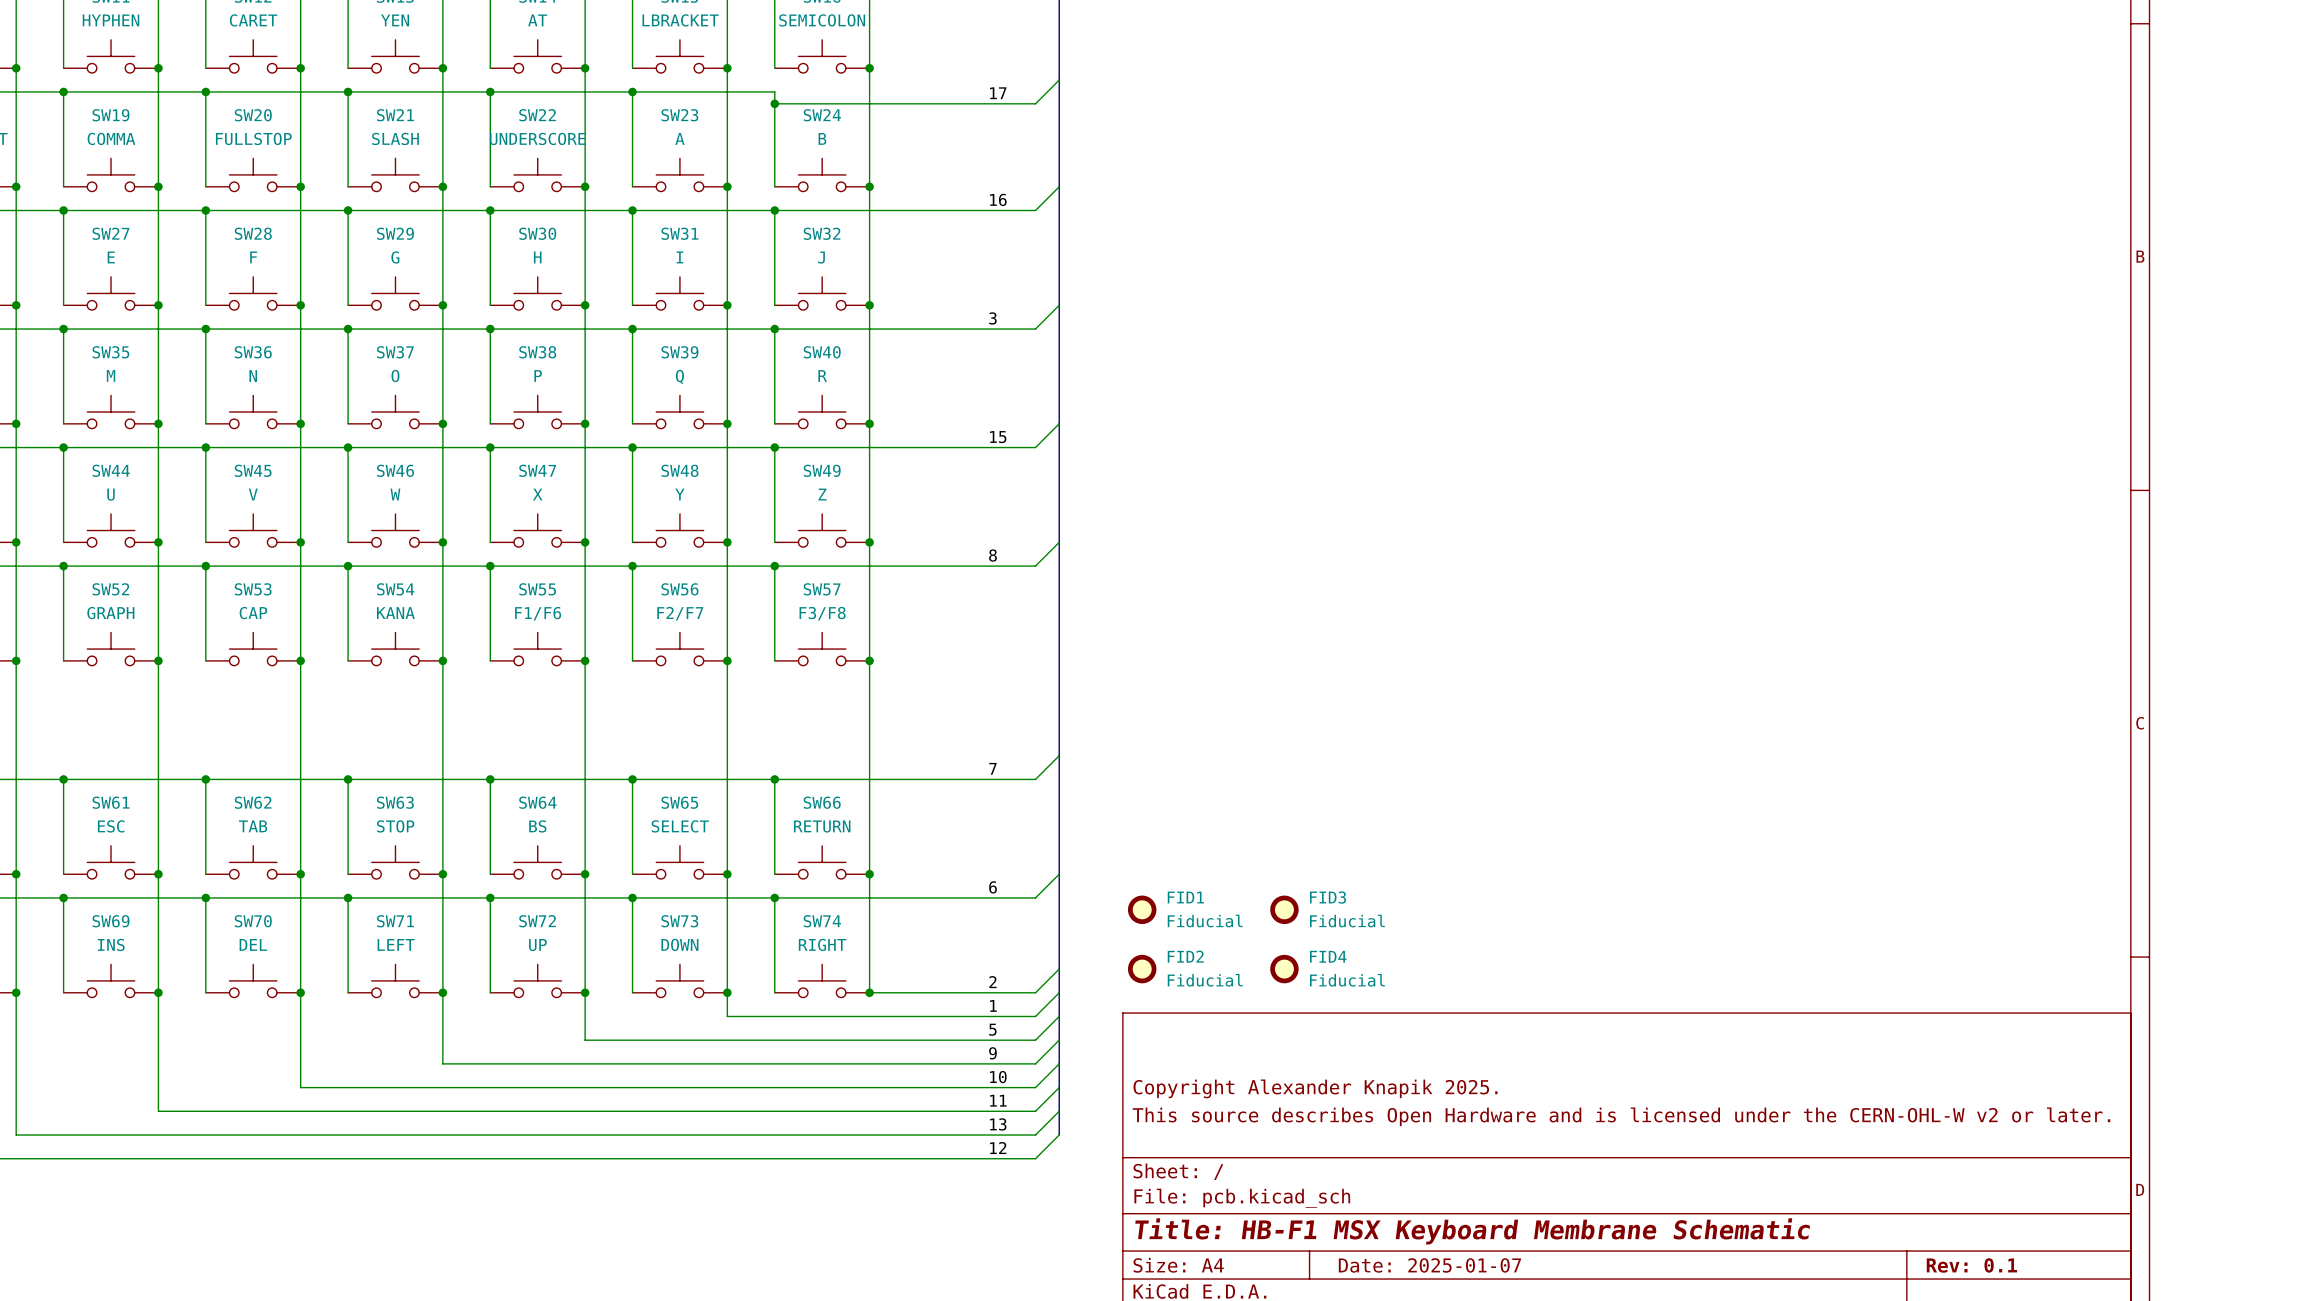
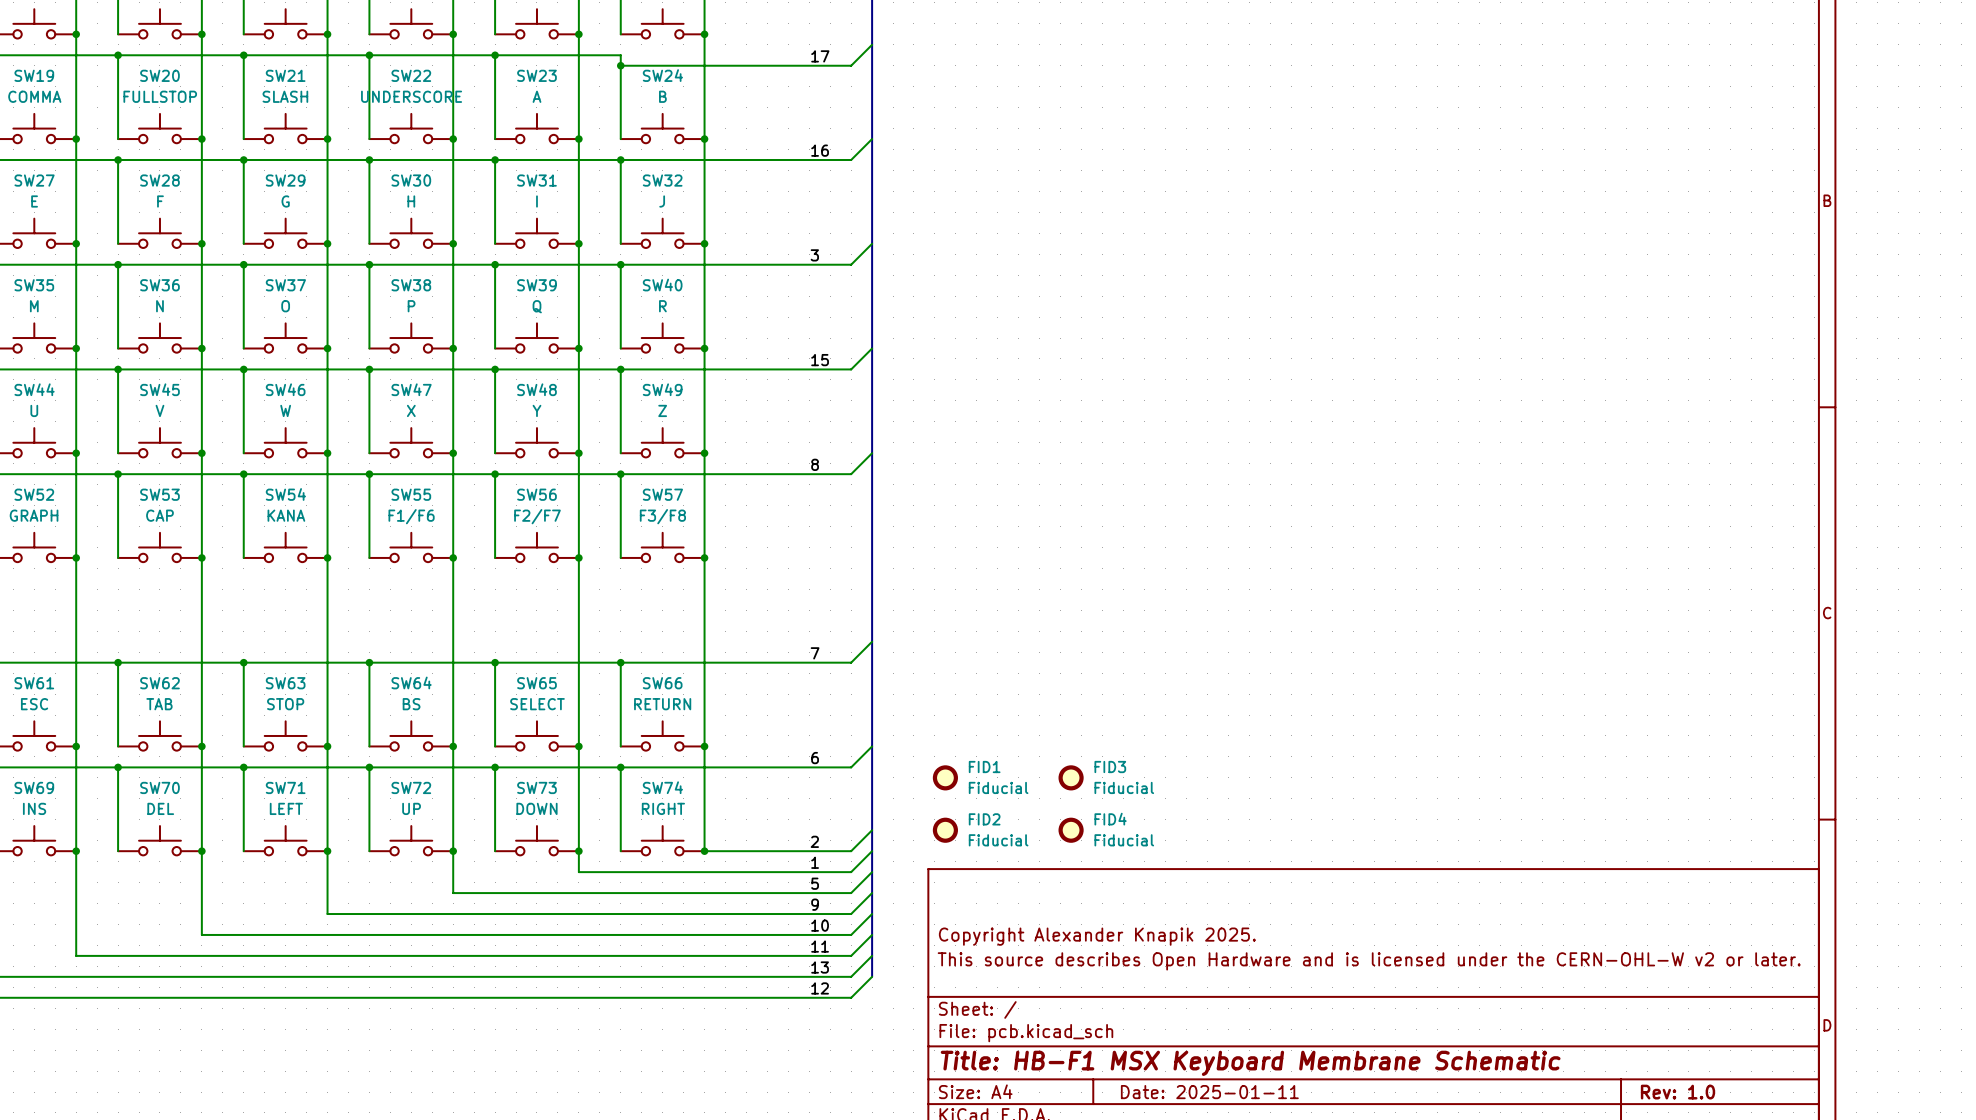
title block: Date: 2025-01-07 (1429, 1265) -> Date: 2025-01-11 (1209, 1092)
title block: Rev: 0.1 (1971, 1265) -> Rev: 1.0 (1678, 1092)

